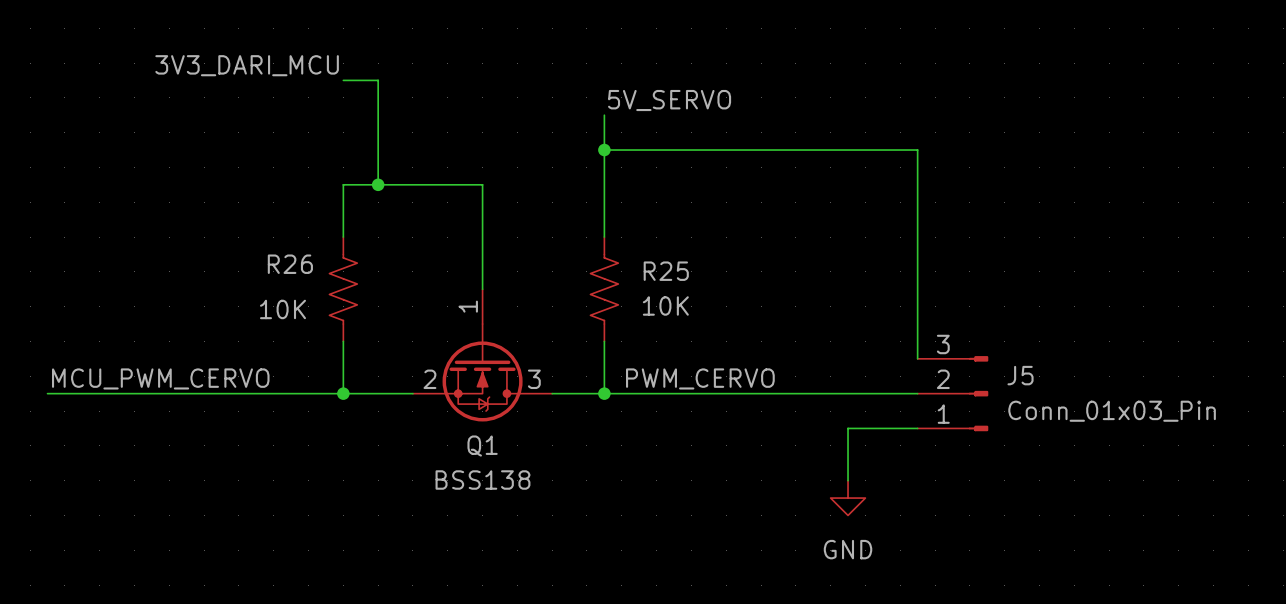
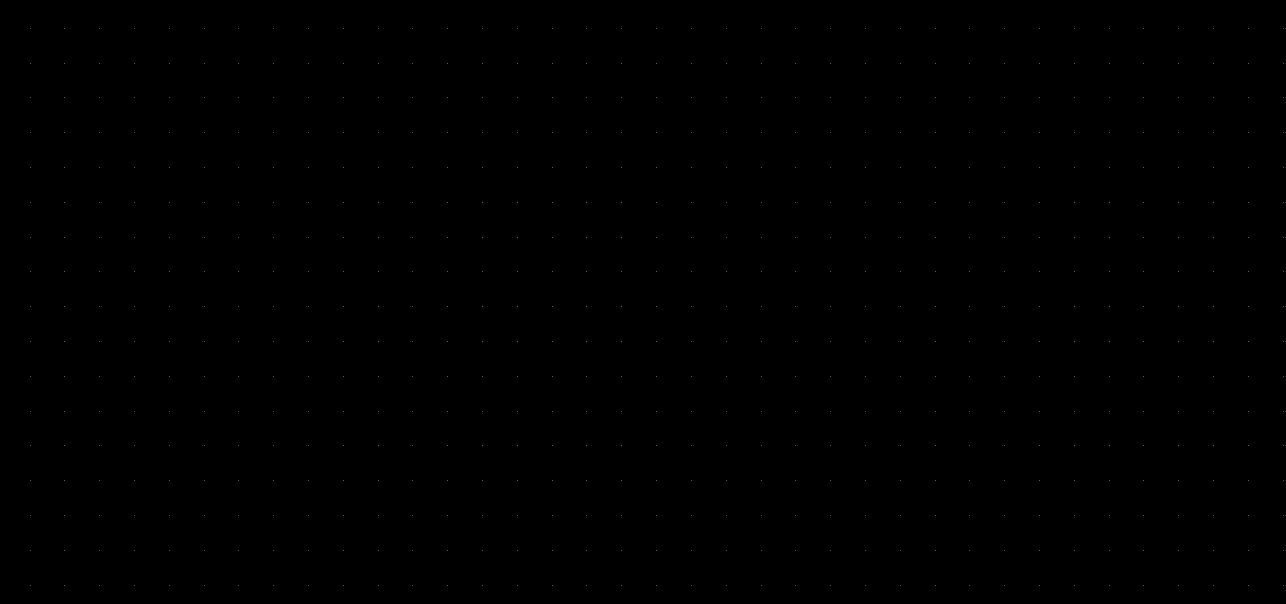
label: 3V3_DARI_MCU (247, 65) -> none
wire: (343, 80) (378, 80) (378, 184) -> none
label: 5V_SERVO (669, 100) -> none
wire: (604, 115) (604, 237) -> none
wire: (604, 150) (917, 150) (917, 358) -> none
junction: (604, 150) -> none
junction: (378, 184) -> none
wire: (343, 237) (343, 184) (482, 184) (482, 289) -> none
R26: 10K (343, 289) -> none
R25: 10K (604, 289) -> none
wire: (343, 341) (343, 393) -> none
wire: (604, 341) (604, 393) -> none
Q1: BSS138 (482, 355) -> none
label: MCU_PWM_CERVO (160, 378) -> none
label: PWM_CERVO (700, 378) -> none
wire: (47, 393) (412, 393) -> none
junction: (343, 393) -> none
wire: (552, 393) (917, 393) -> none
junction: (604, 393) -> none
J5: Conn_01x03_Pin (952, 393) -> none
wire: (917, 428) (848, 428) (848, 480) -> none
power symbol: GND (848, 498) -> none

